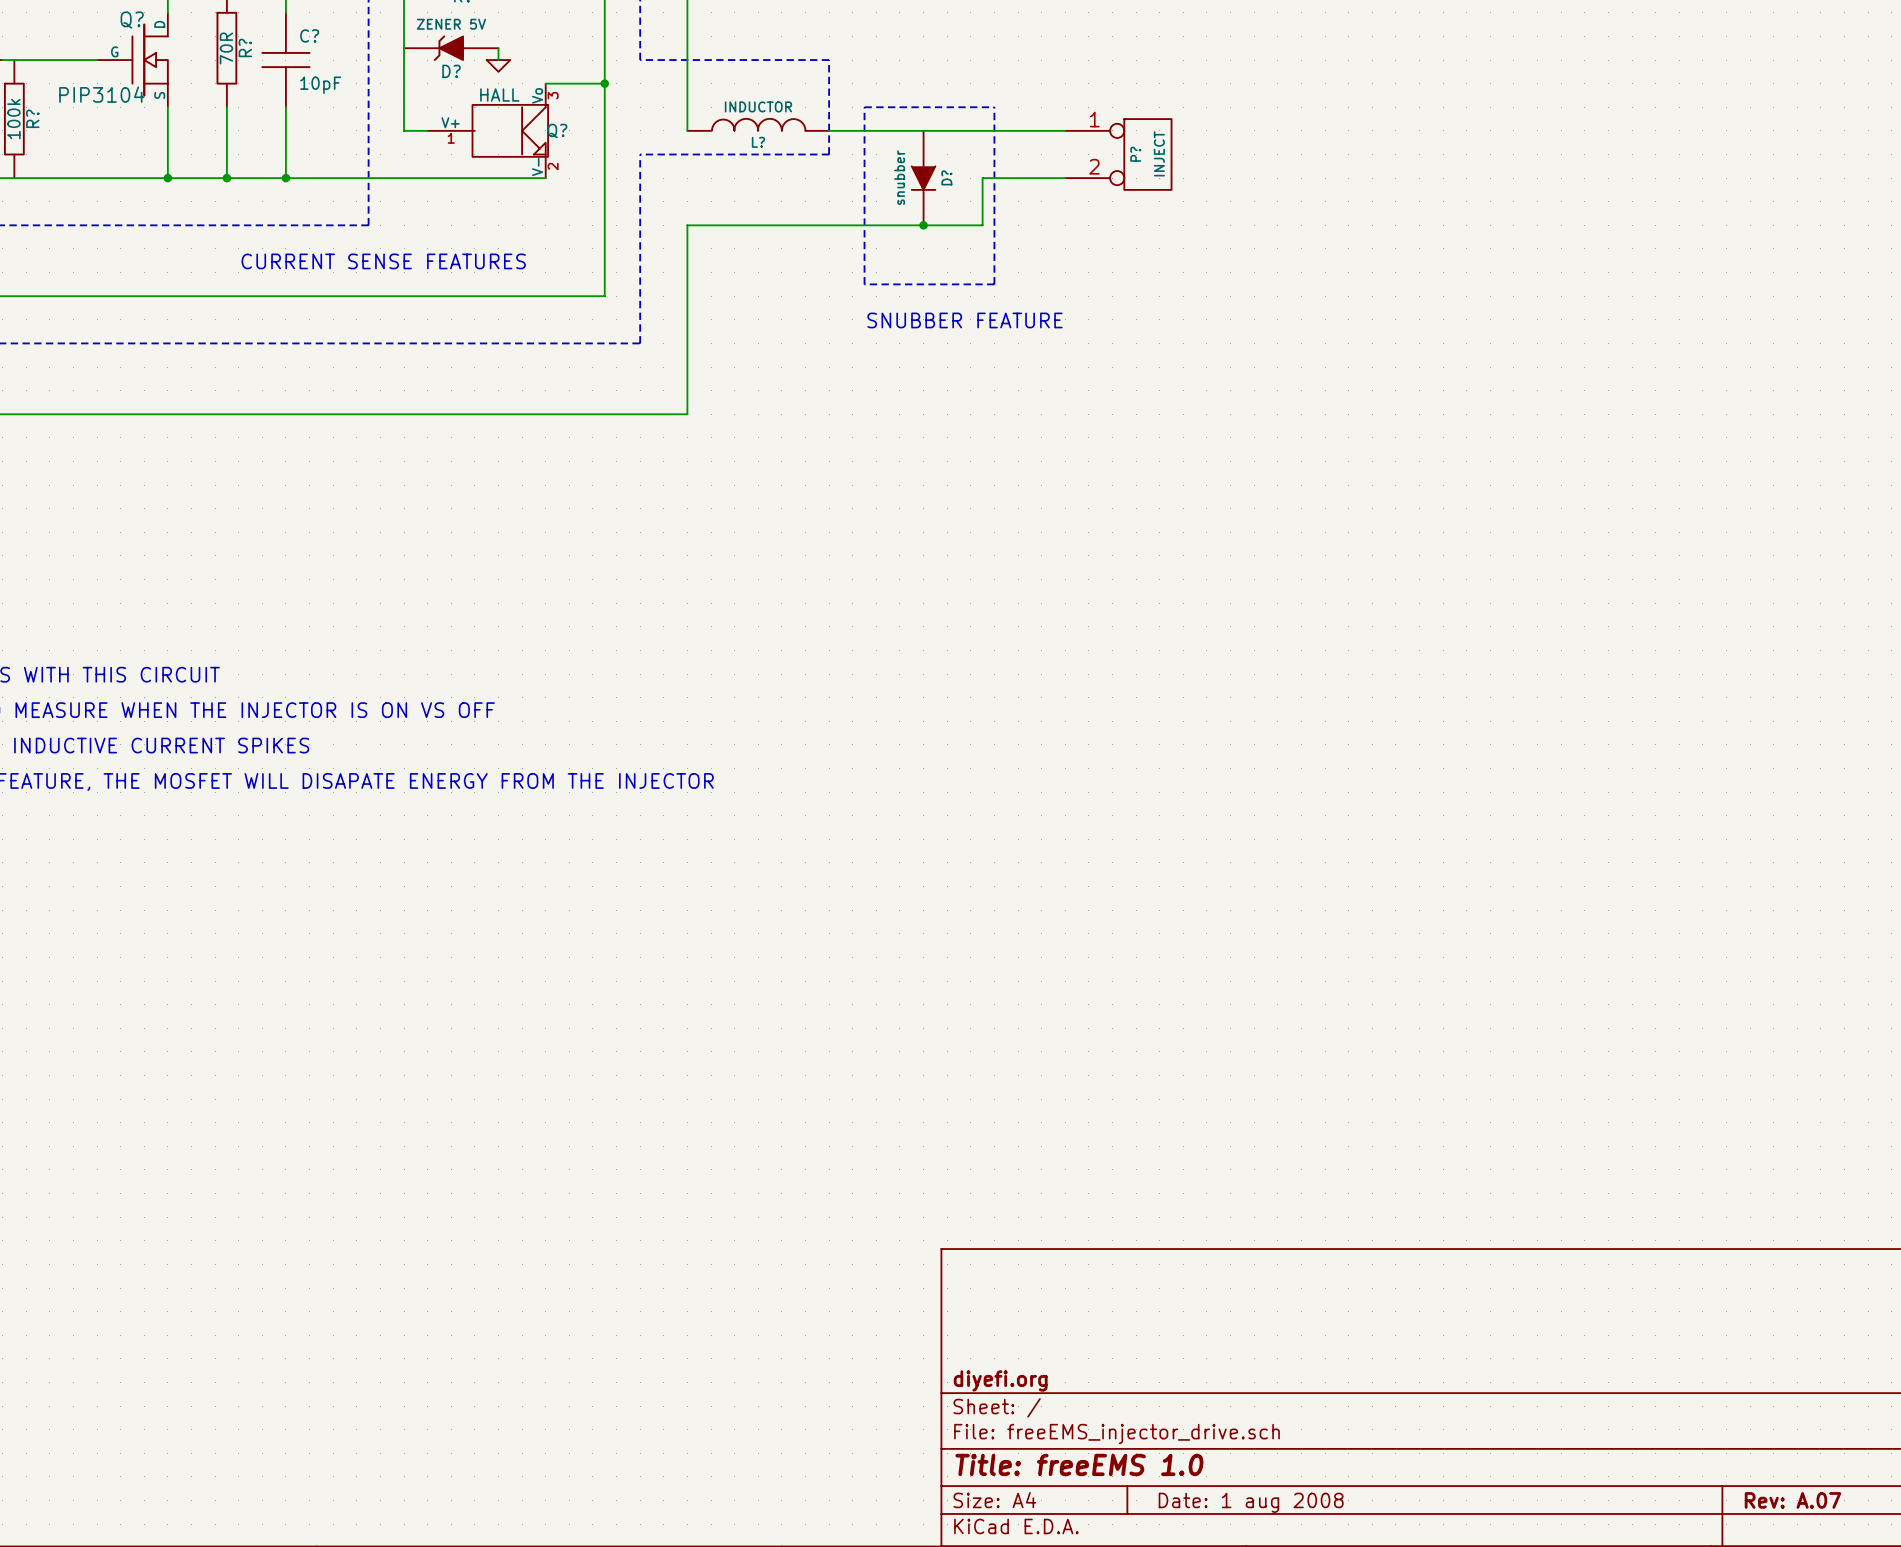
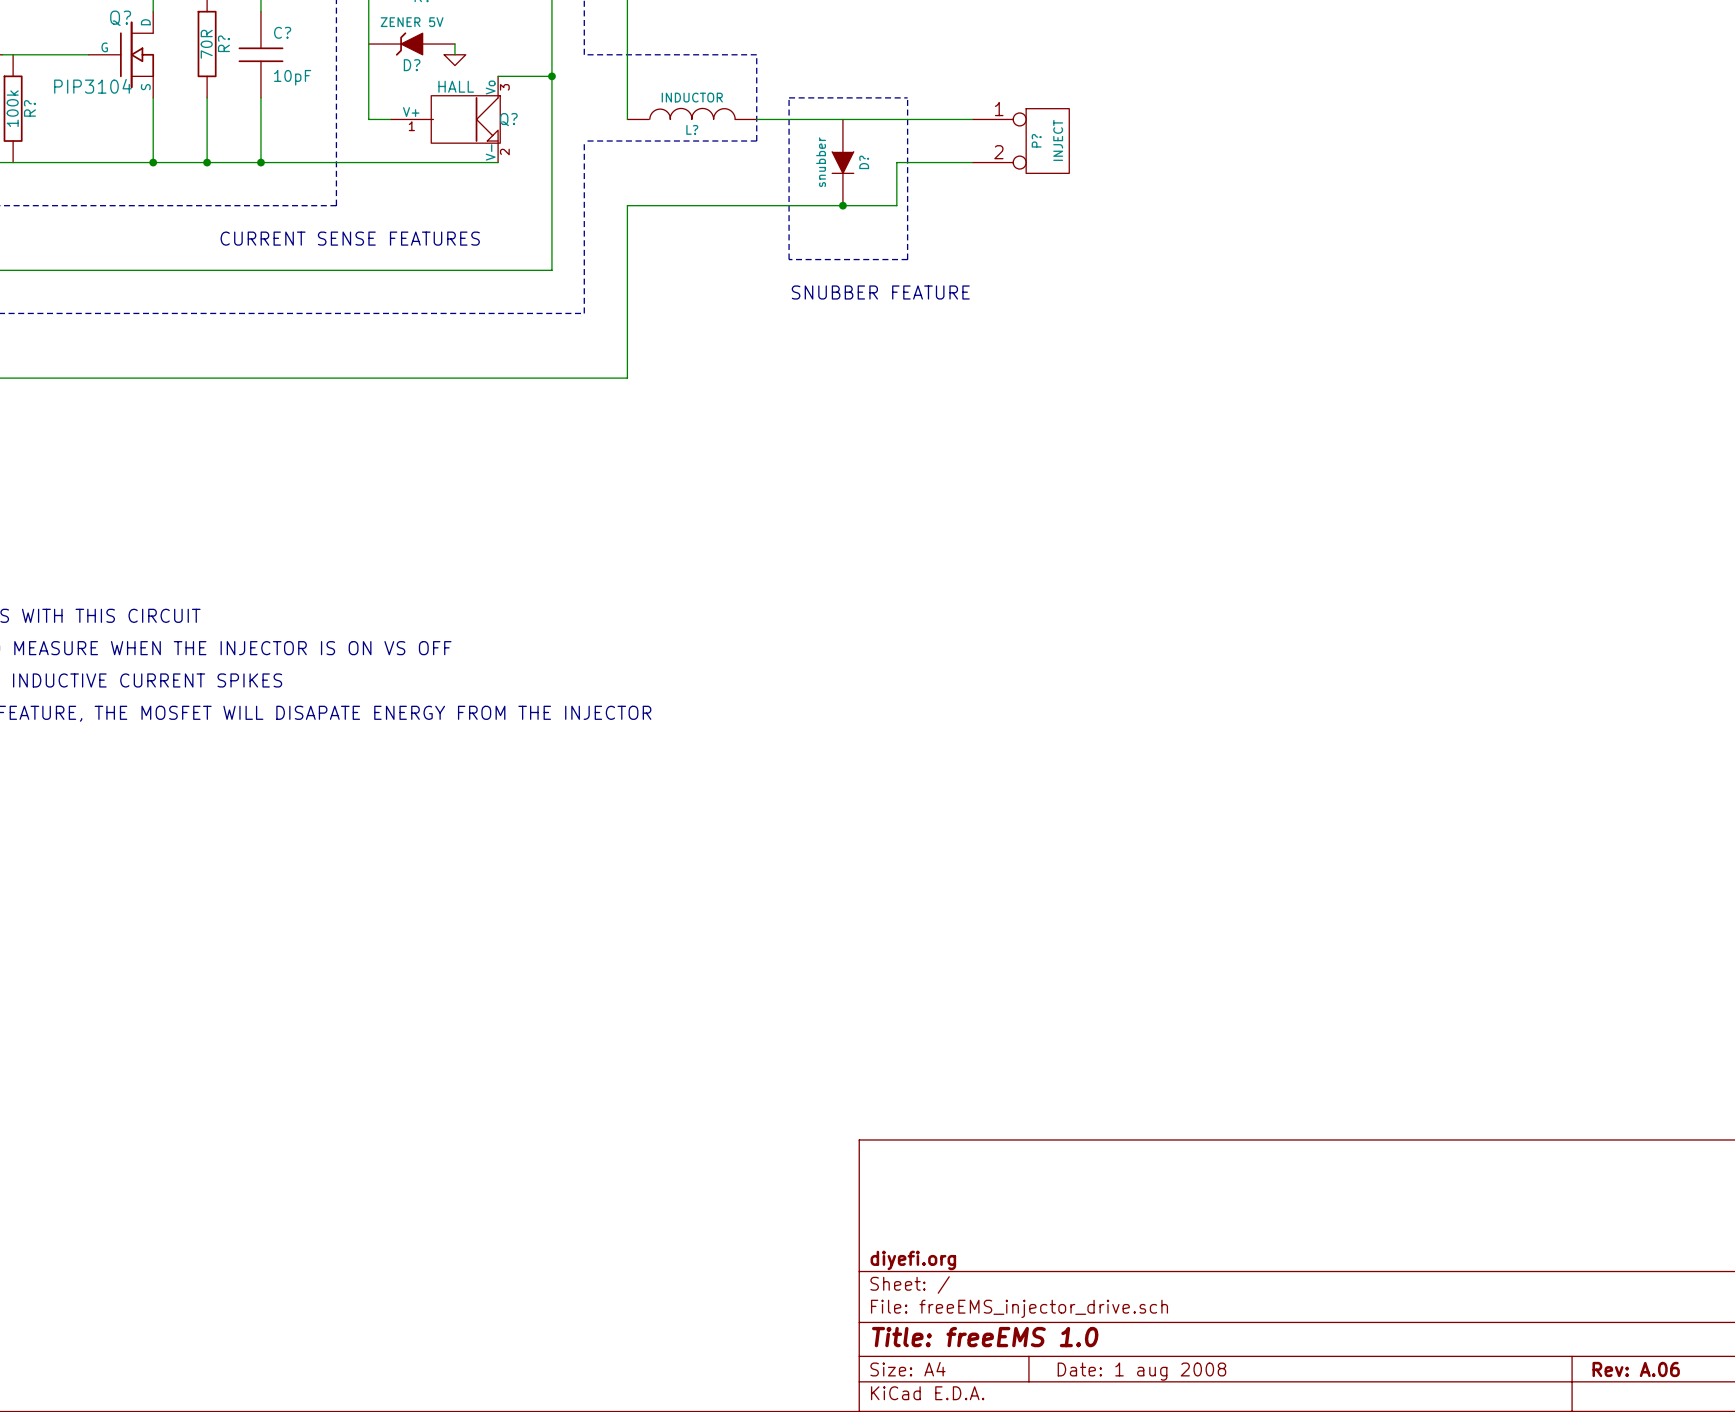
title block: Rev: A.07 (1792, 1500) -> Rev: A.06 (1636, 1369)

